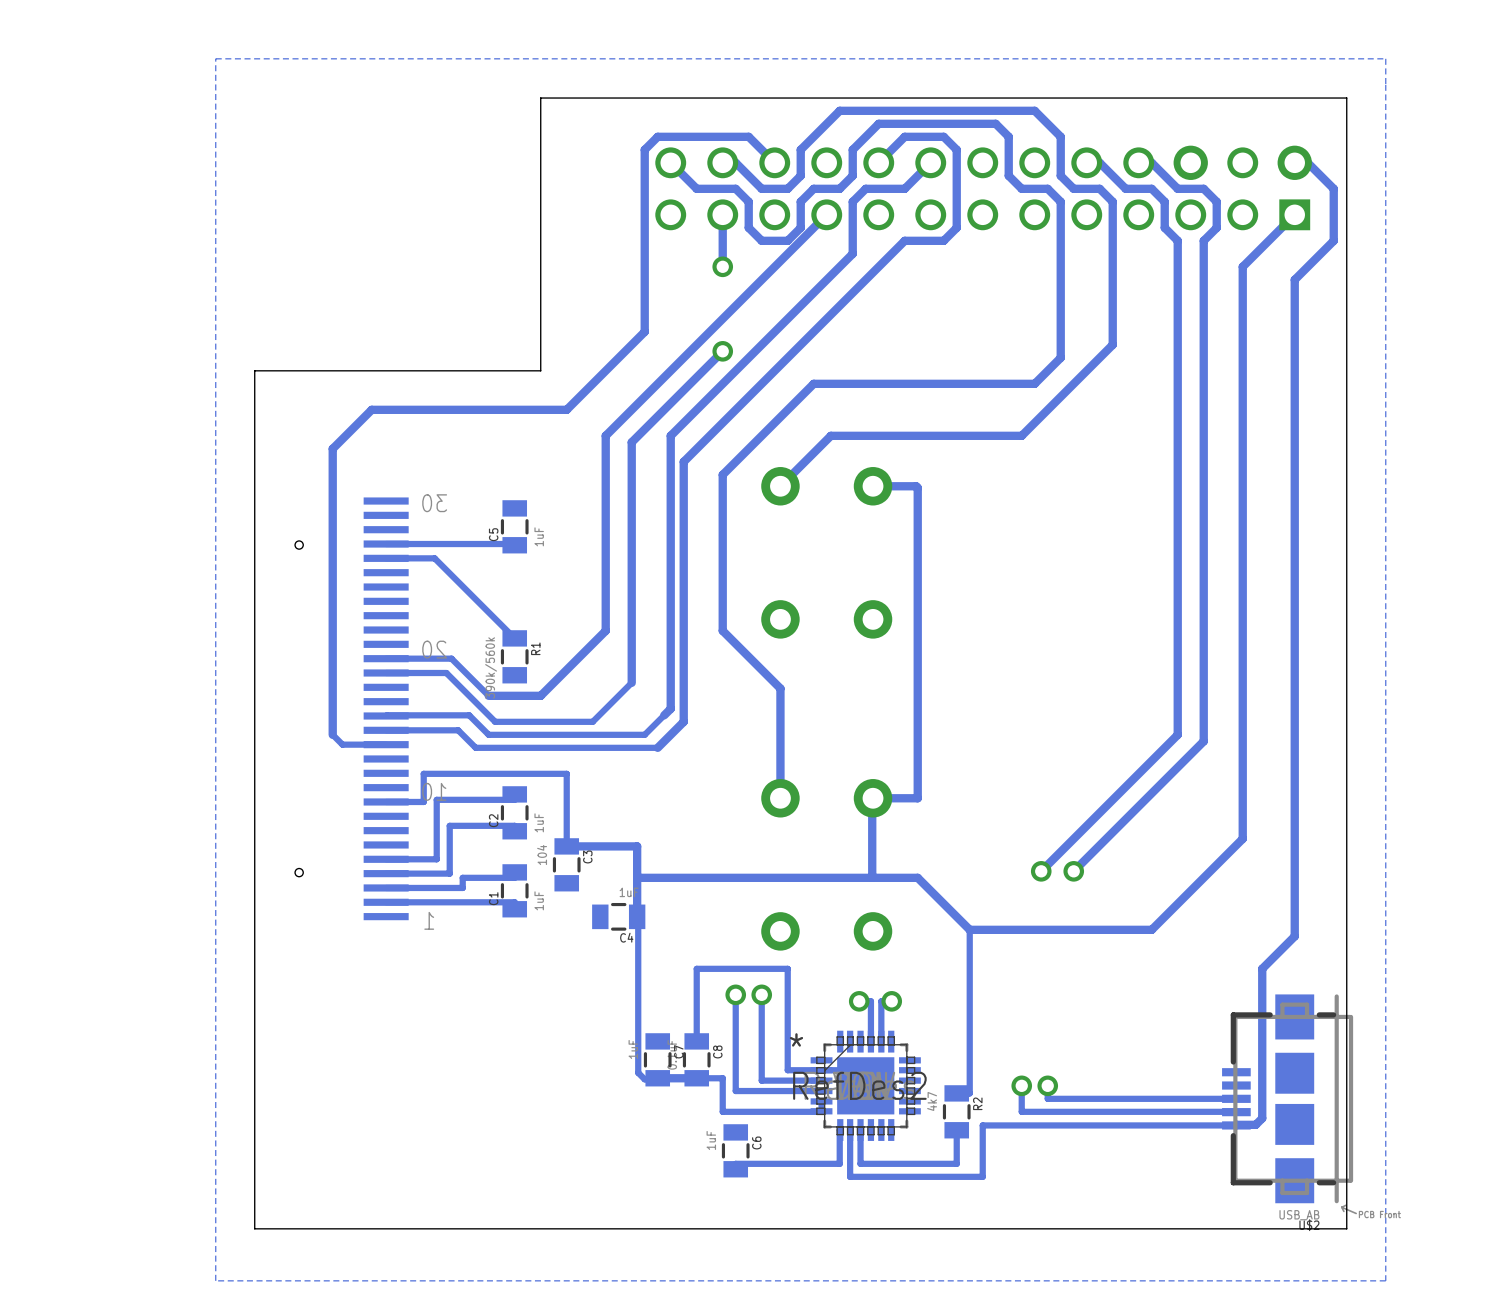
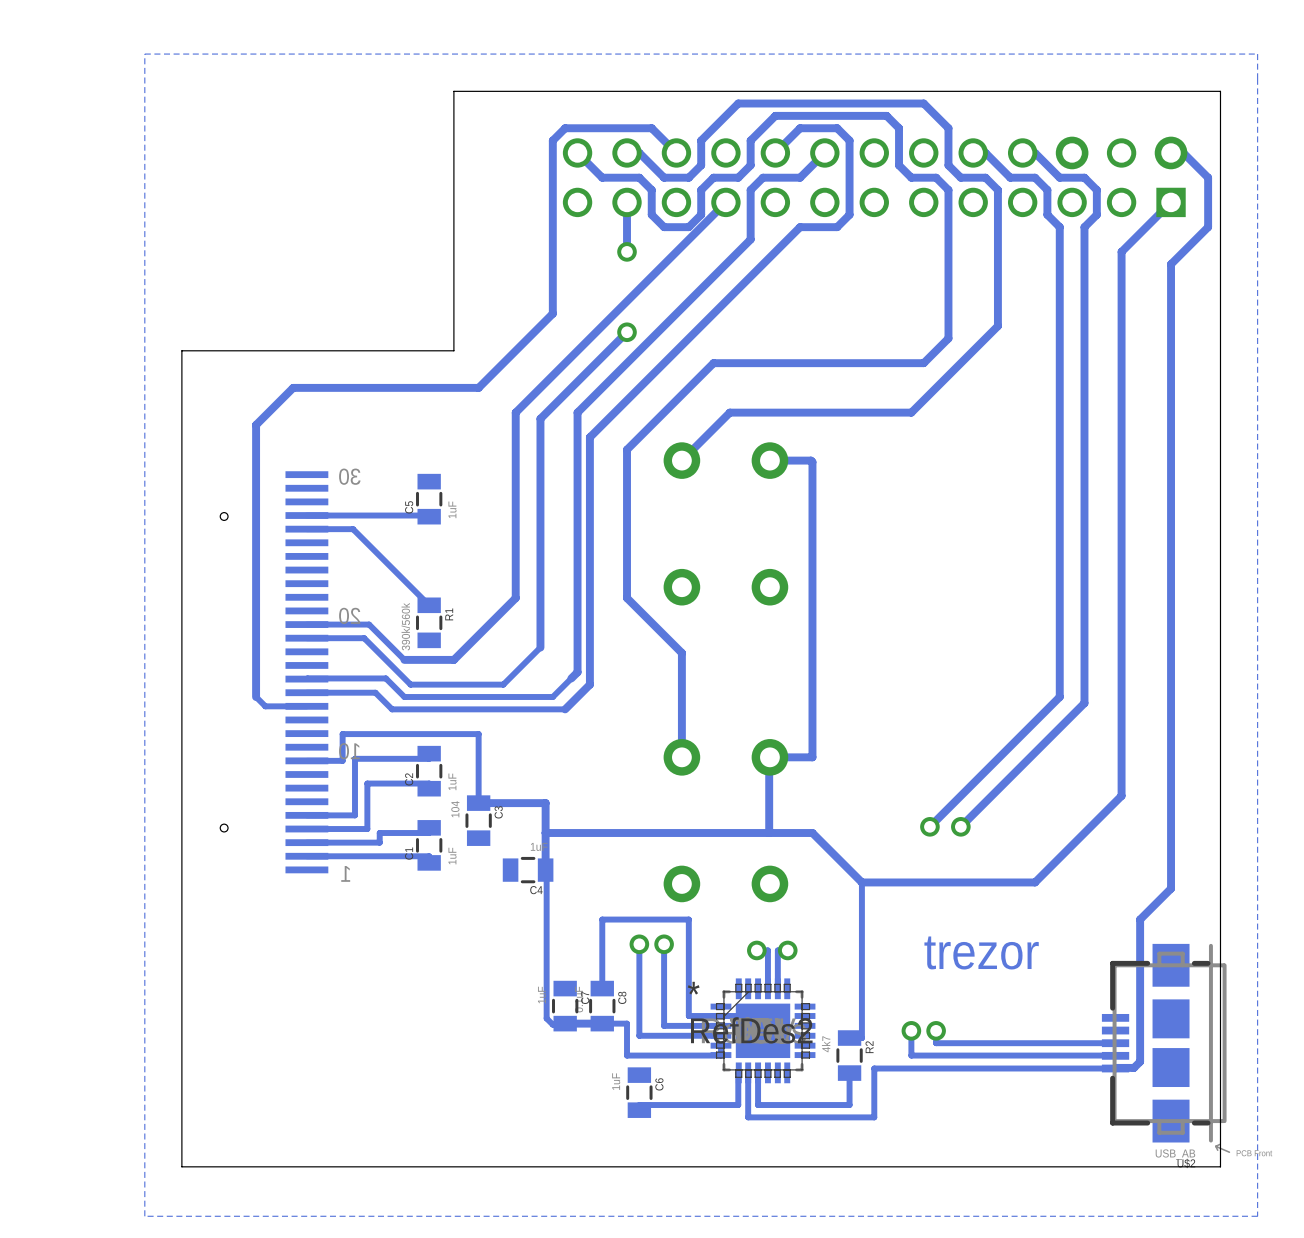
text: none -> trezor (981, 952)

